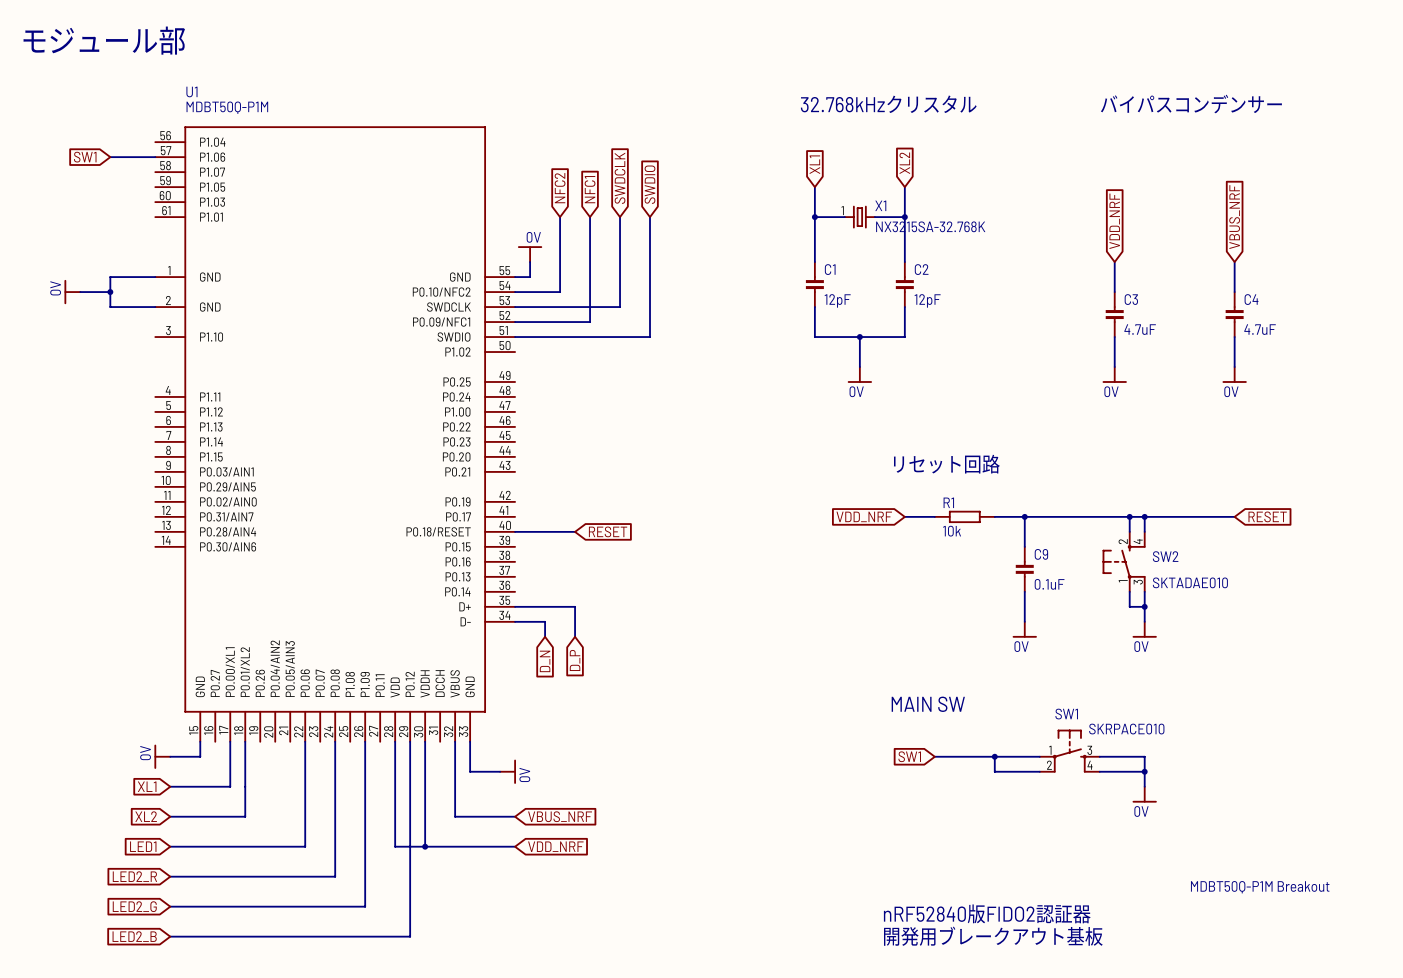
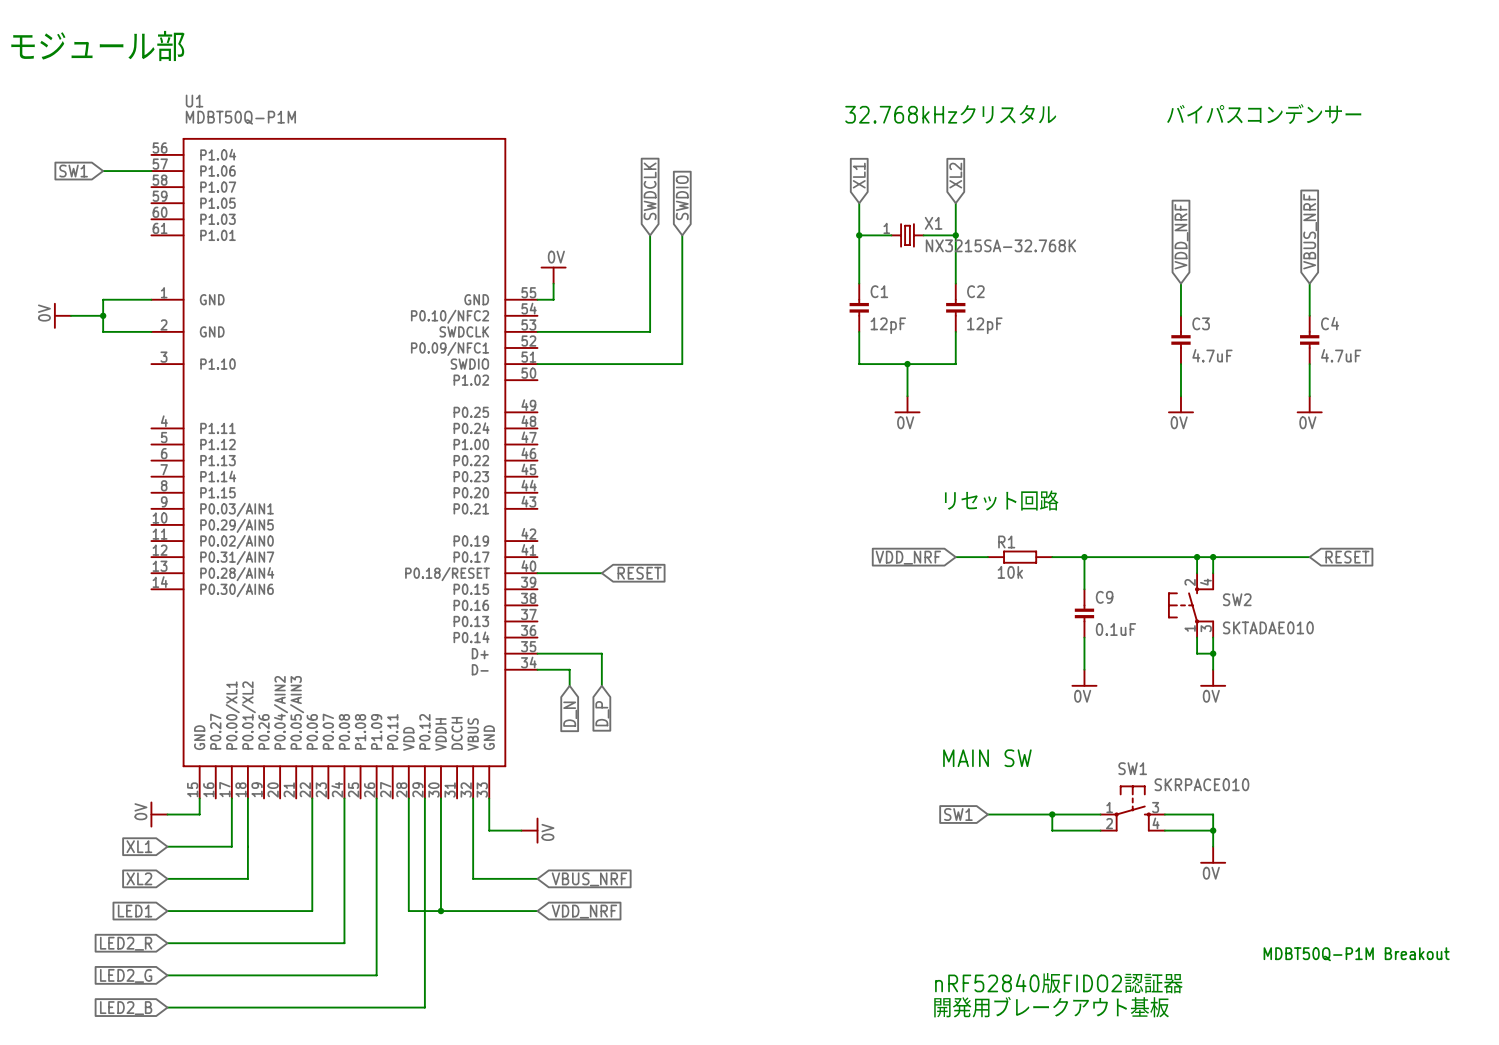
global label: NFC2 (560, 188) -> none
global label: NFC1 (590, 189) -> none
wire: (560, 217) (560, 292) (515, 292) -> none
wire: (590, 217) (590, 322) (515, 322) -> none

